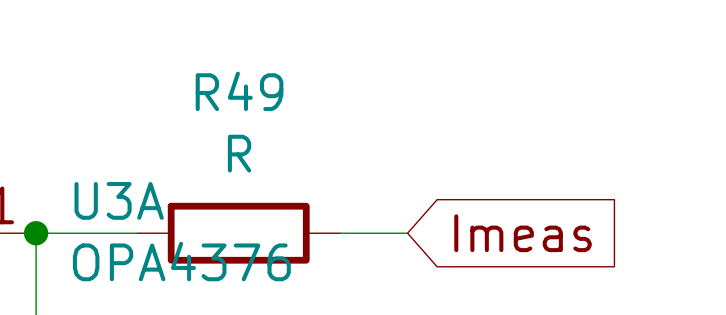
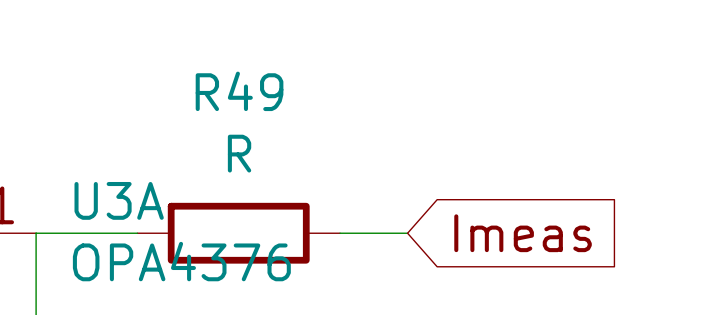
junction: (36, 233) -> none

